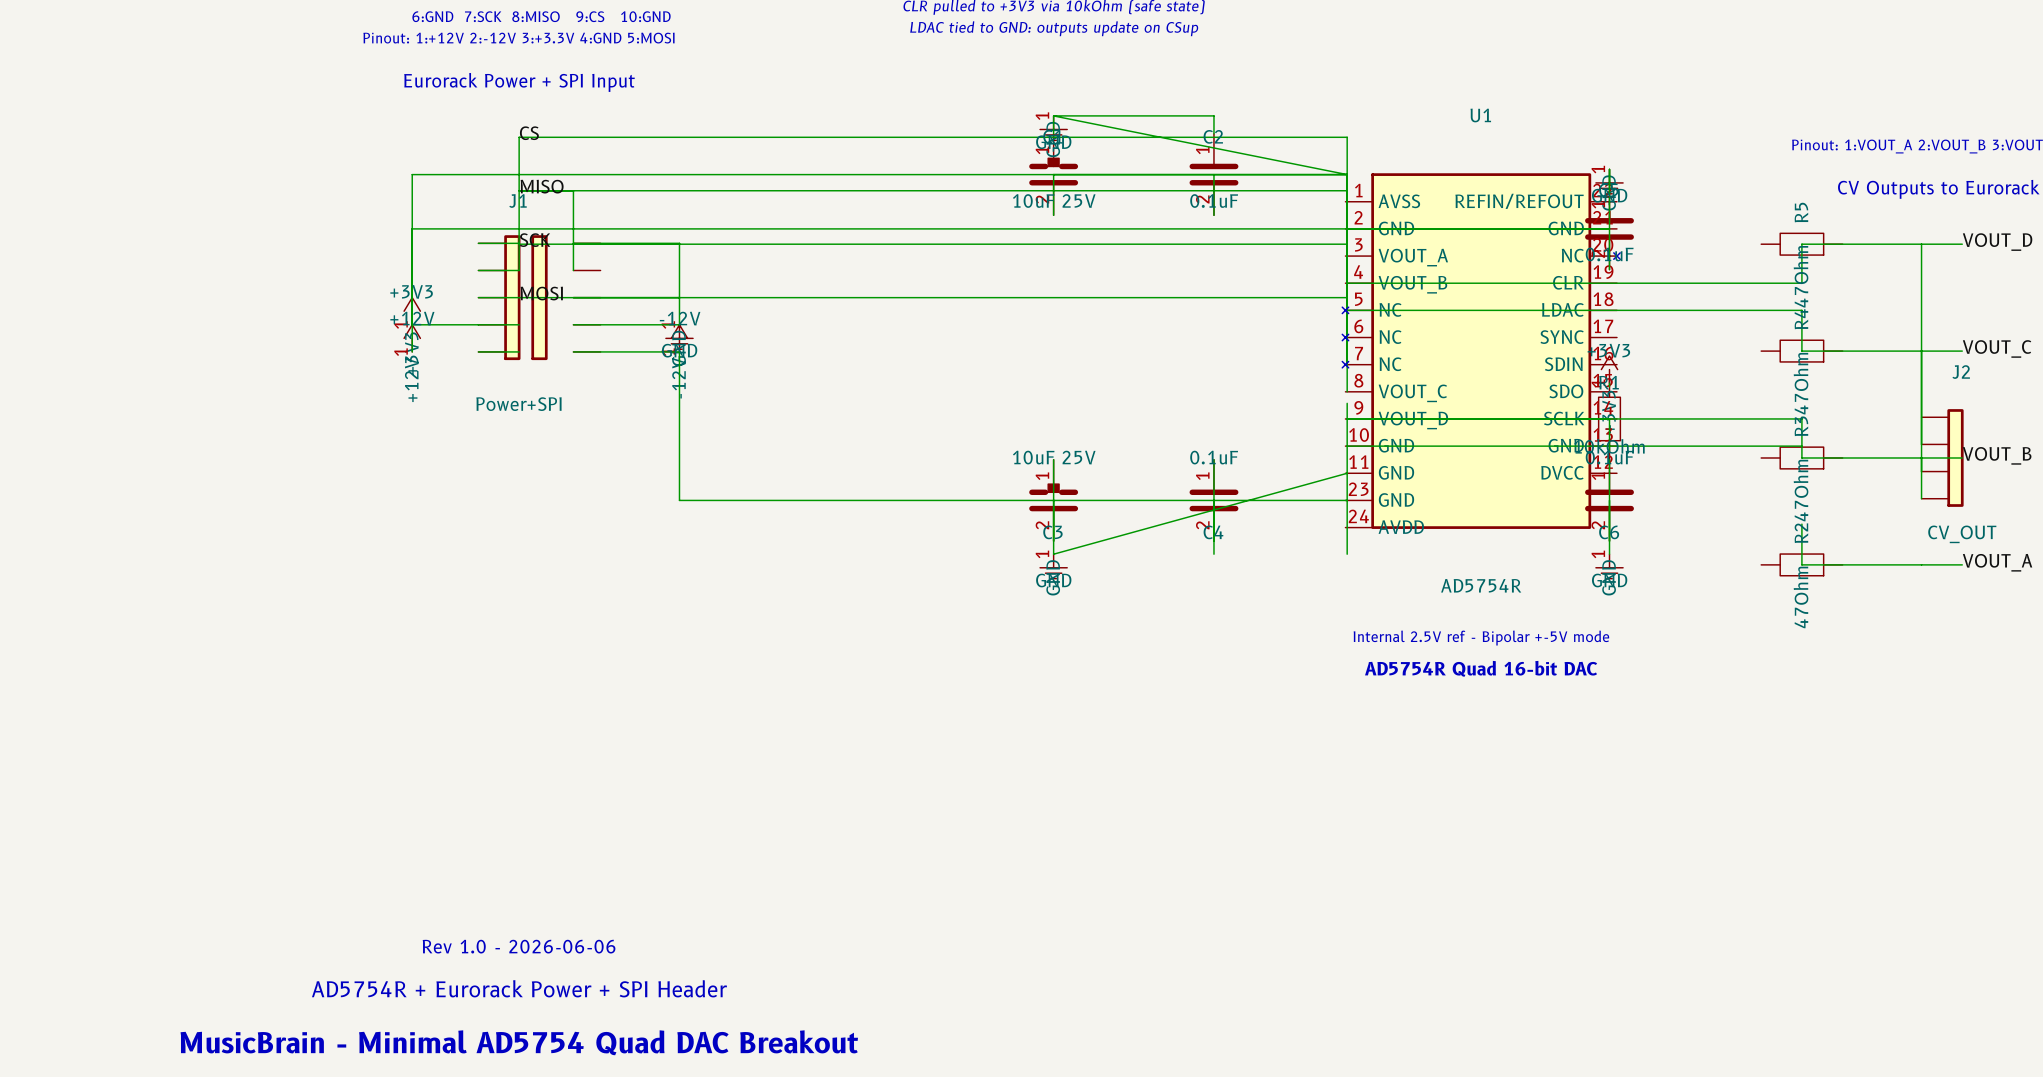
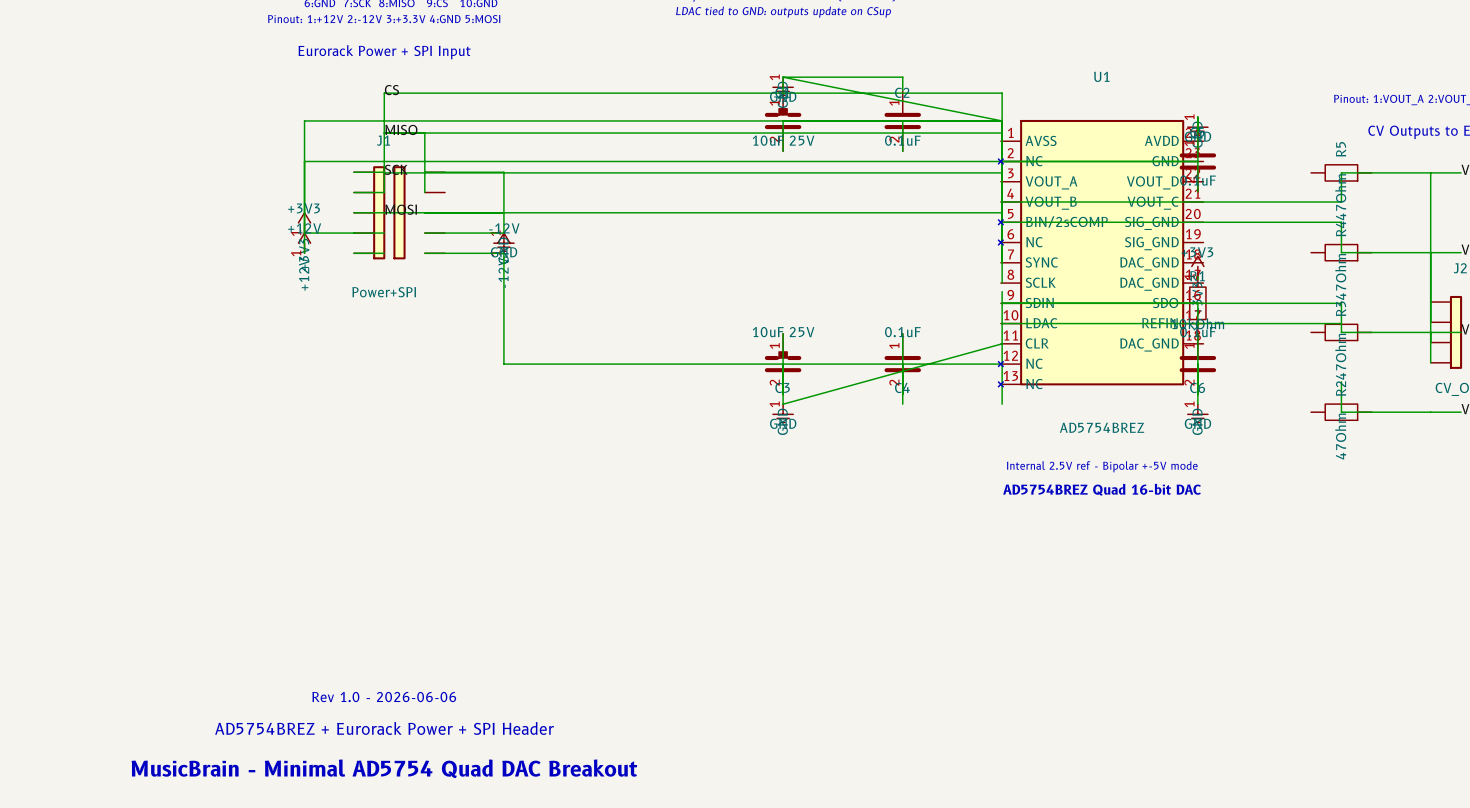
U1 symbol: [1342, 173, 1621, 529] -> [998, 119, 1204, 387]
U1 value: AD5754R (1481, 585) -> AD5754BREZ (1102, 427)
text: AD5754R Quad 16-bit DAC (1481, 668) -> AD5754BREZ Quad 16-bit DAC (1102, 489)
text: AD5754R + Eurorack Power + SPI Header (519, 988) -> AD5754BREZ + Eurorack Power + SPI Header (384, 728)

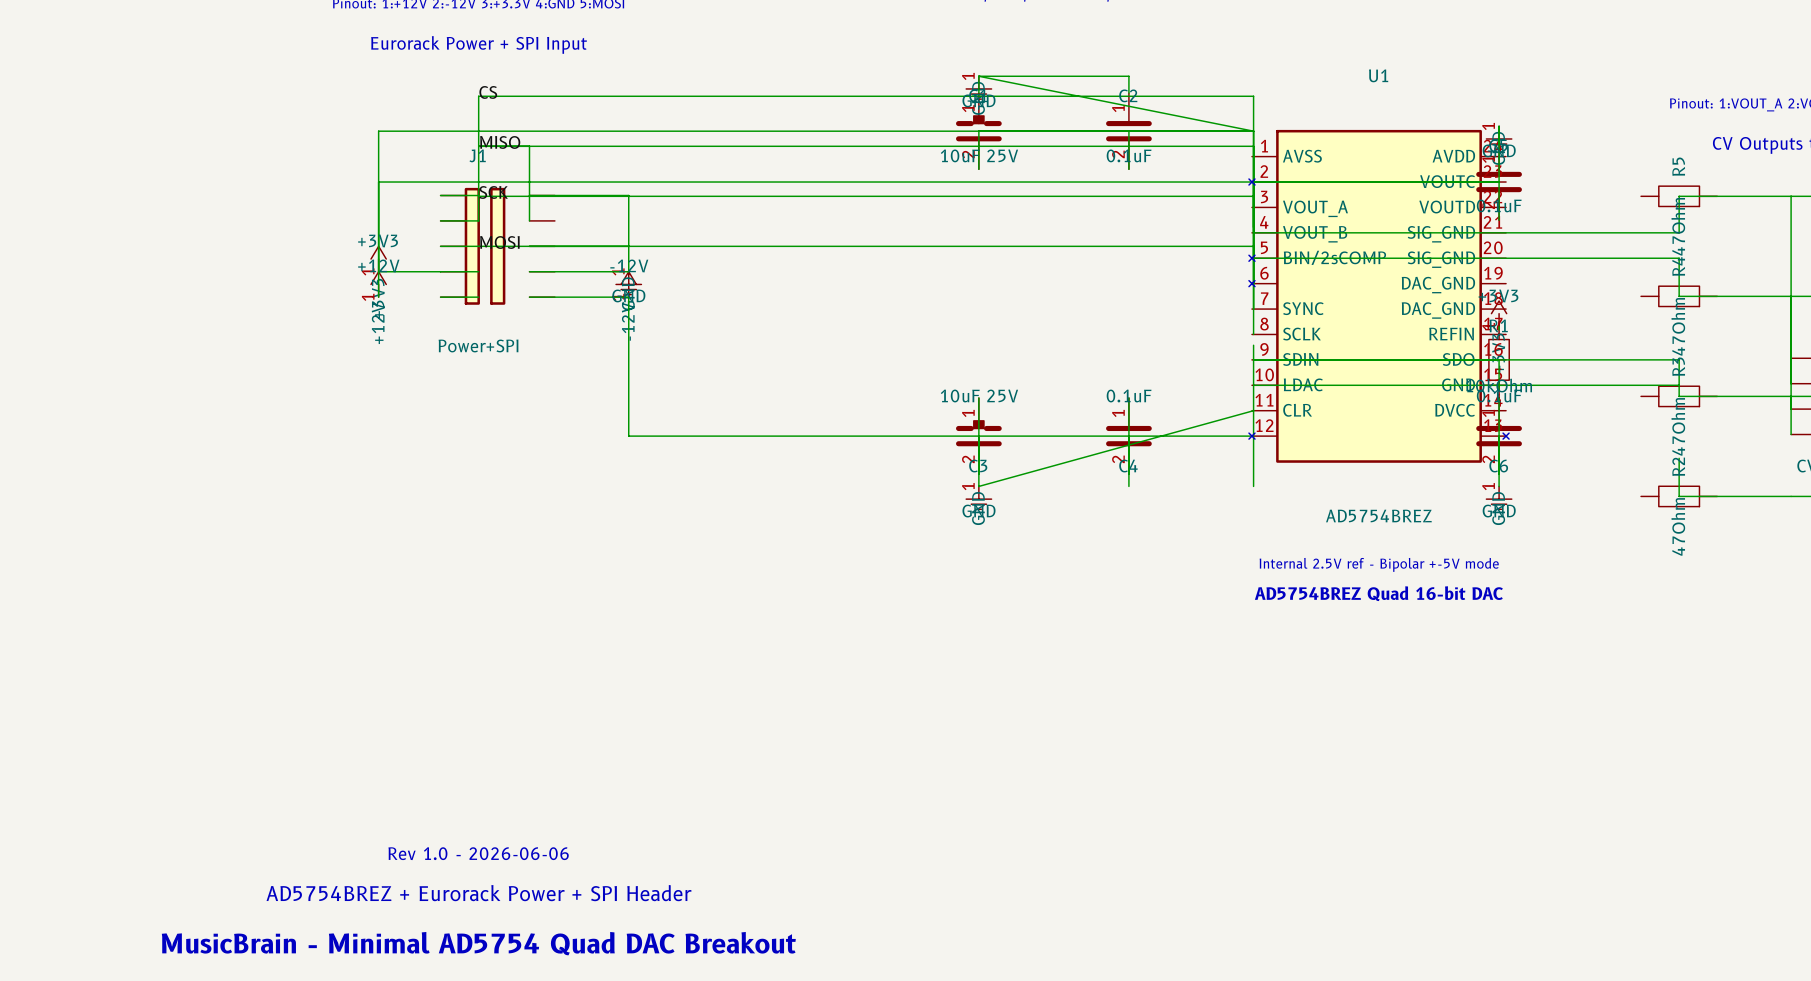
U1 symbol: [998, 119, 1204, 387] -> [1248, 129, 1510, 463]

